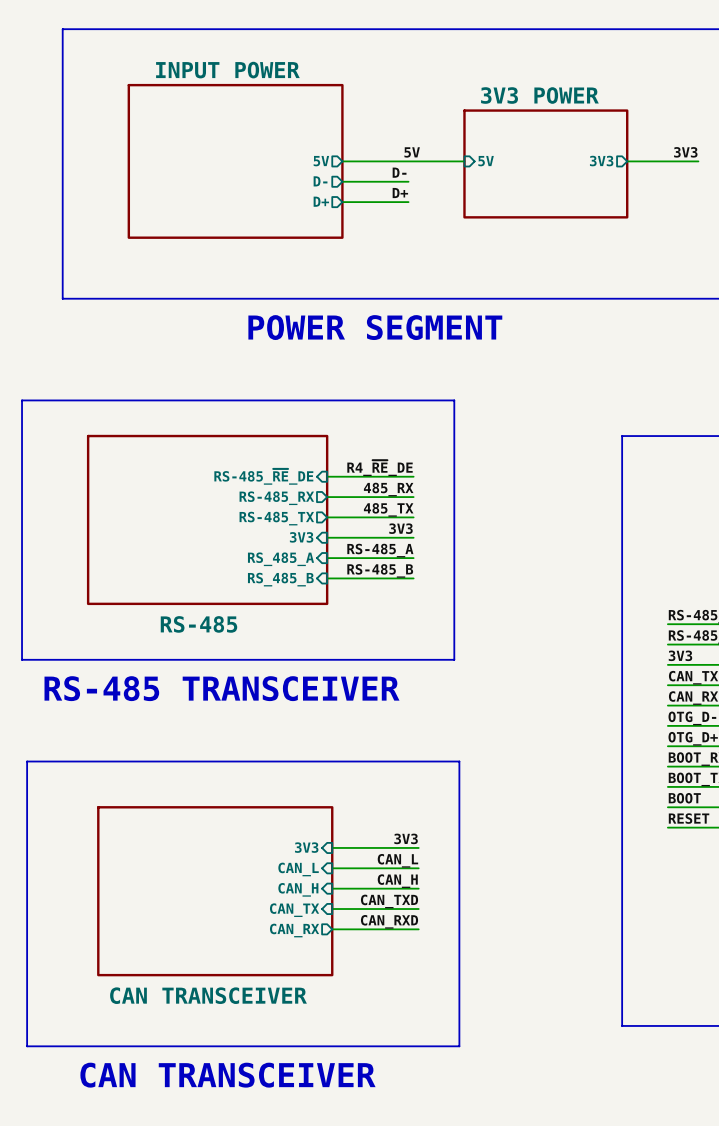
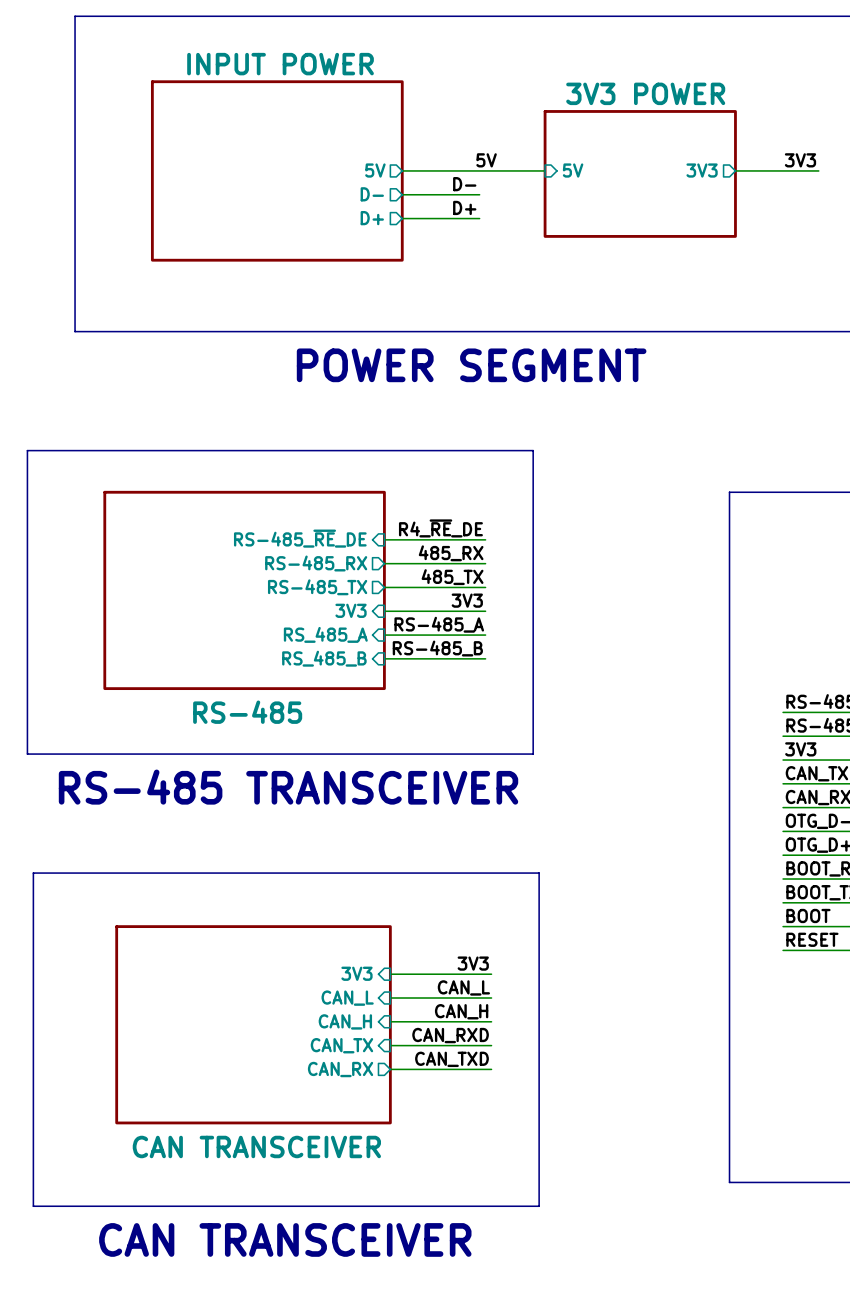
label: CAN_TXD (389, 901) -> CAN_RXD (450, 1035)
label: CAN_RXD (389, 921) -> CAN_TXD (451, 1059)

